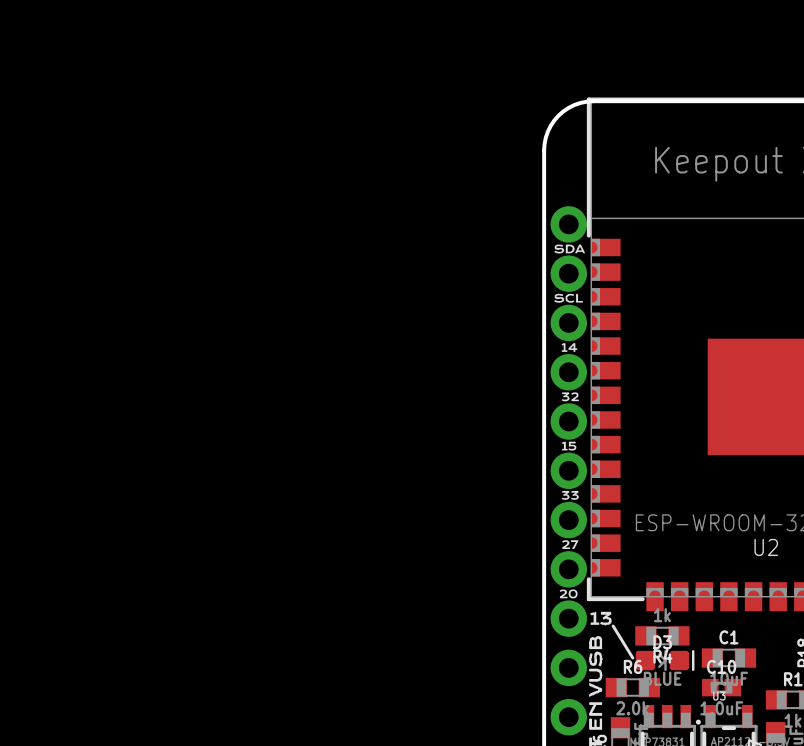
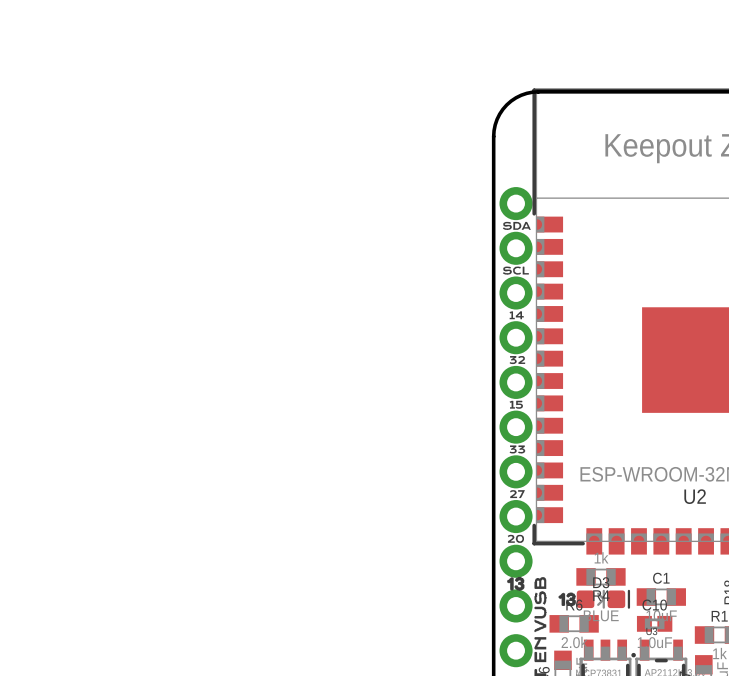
drawing: [590, 611, 612, 626] -> none
line: (613, 626) (632, 658) -> none
drawing: none -> [507, 576, 525, 591]
drawing: none -> [558, 592, 576, 607]

